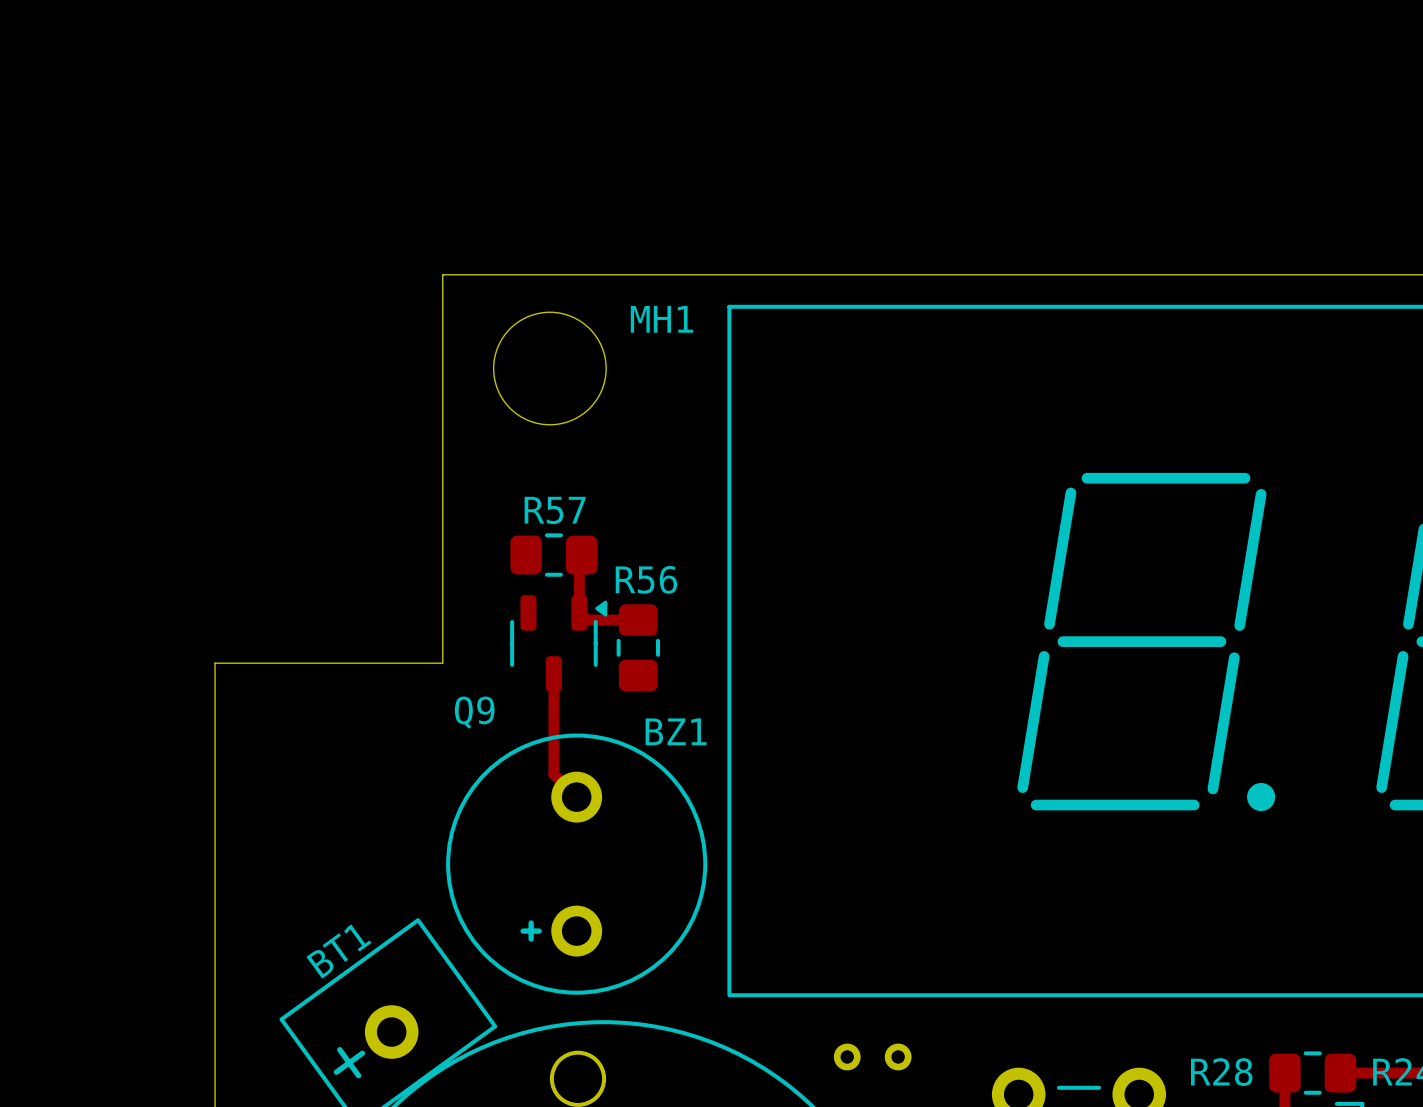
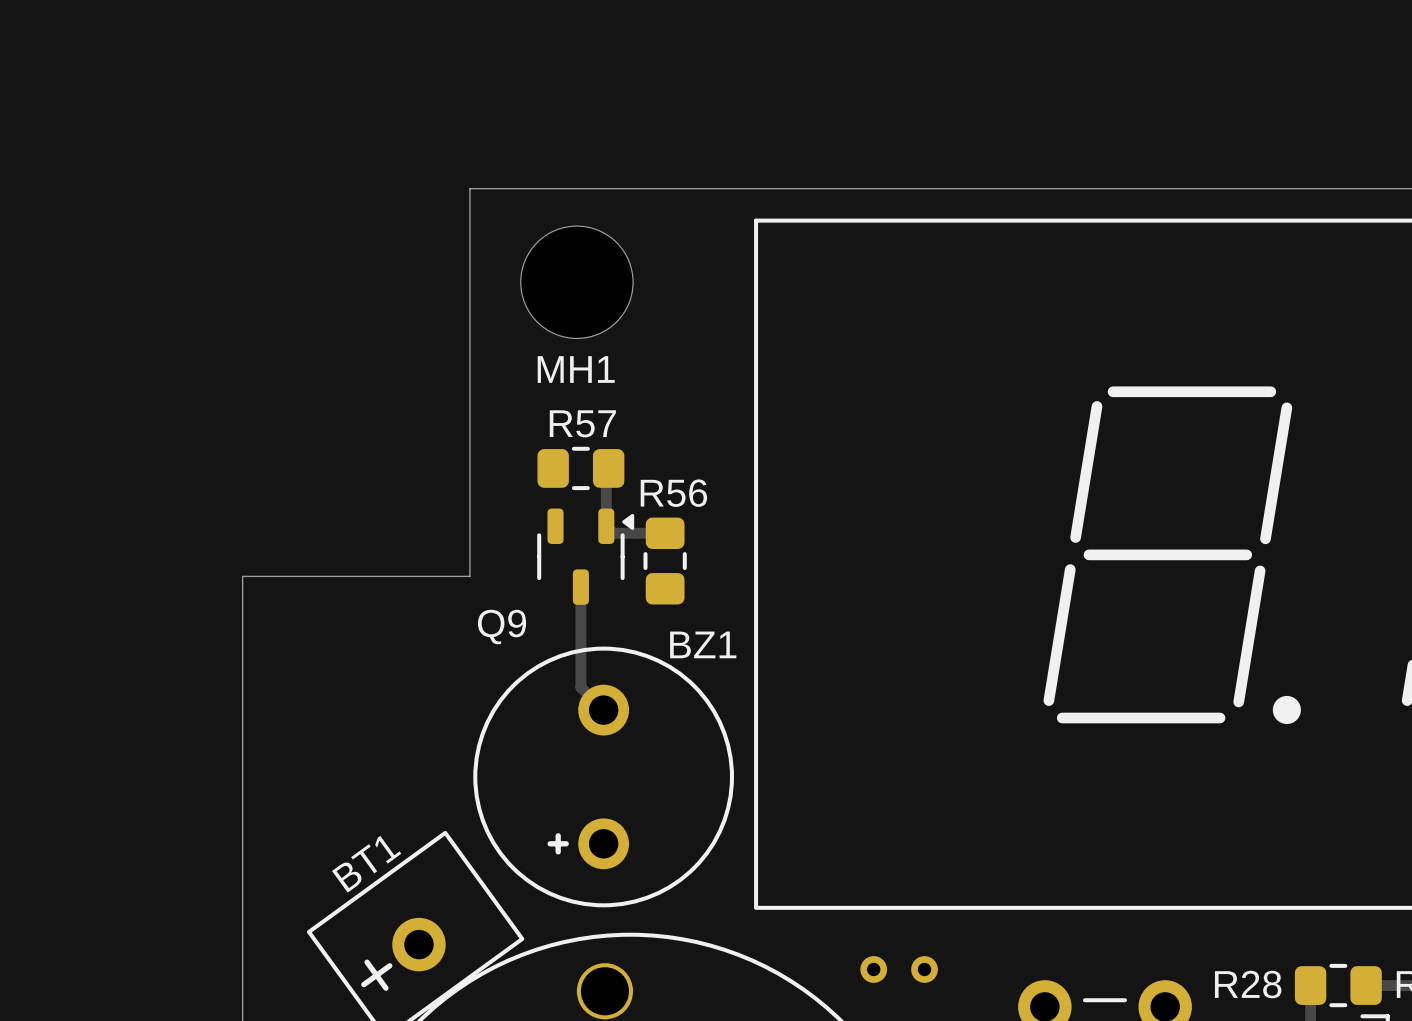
MH1 name position: MH1 (661, 319) -> MH1 (576, 369)

